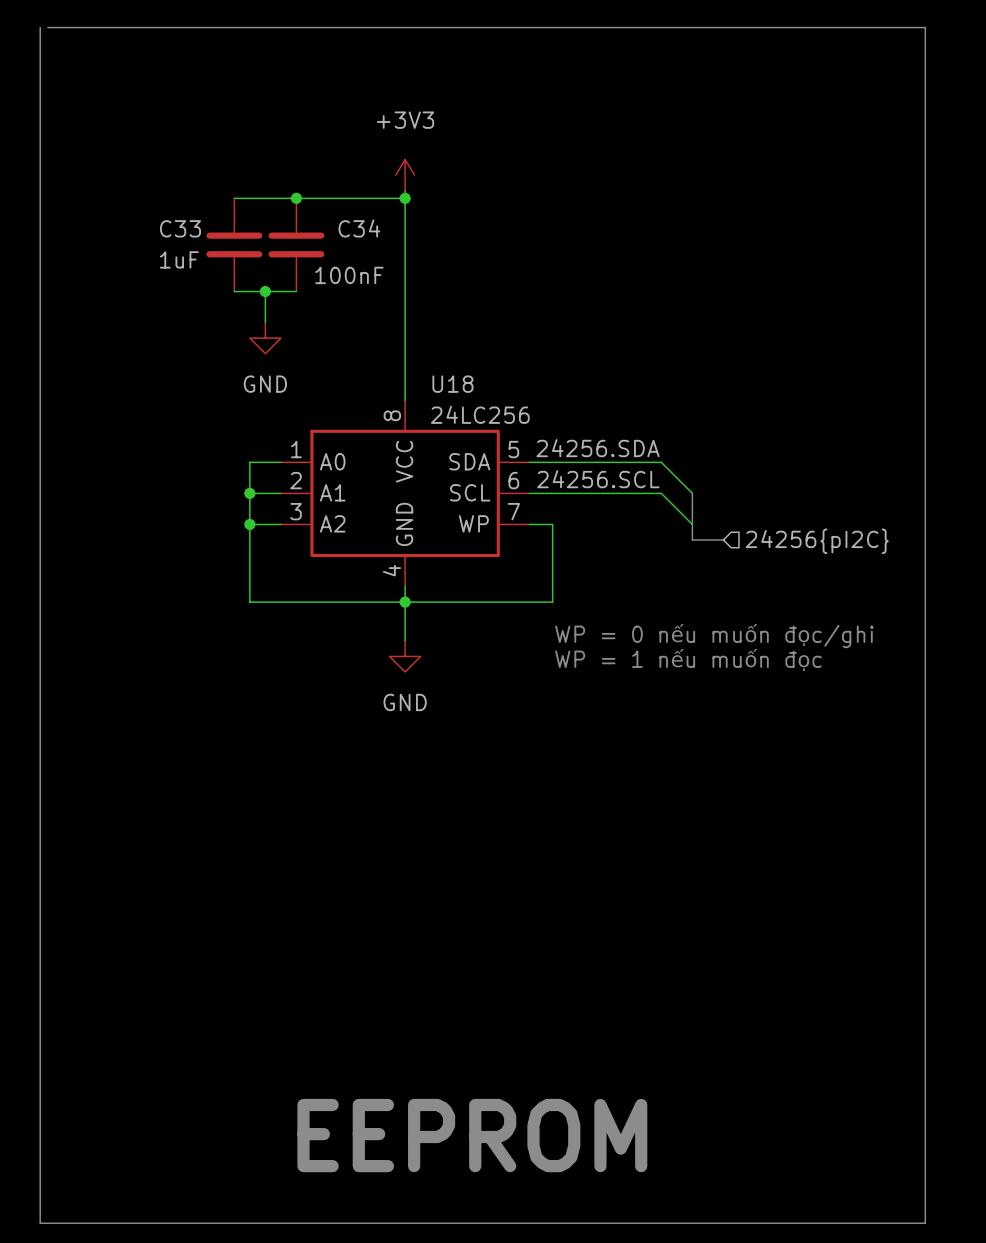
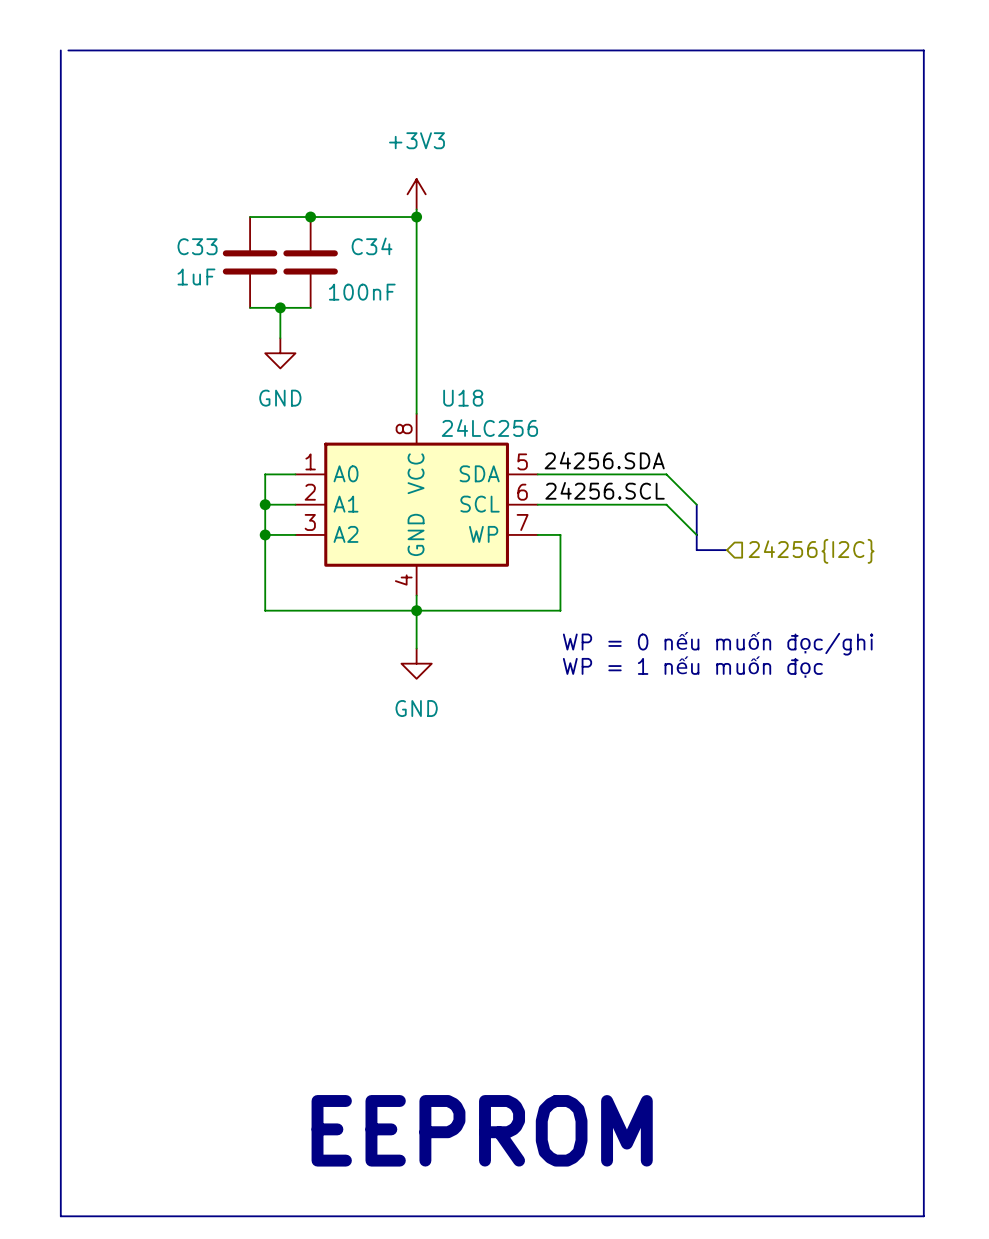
hierarchical label: 24256{pI2C} (817, 541) -> 24256{I2C} (811, 551)

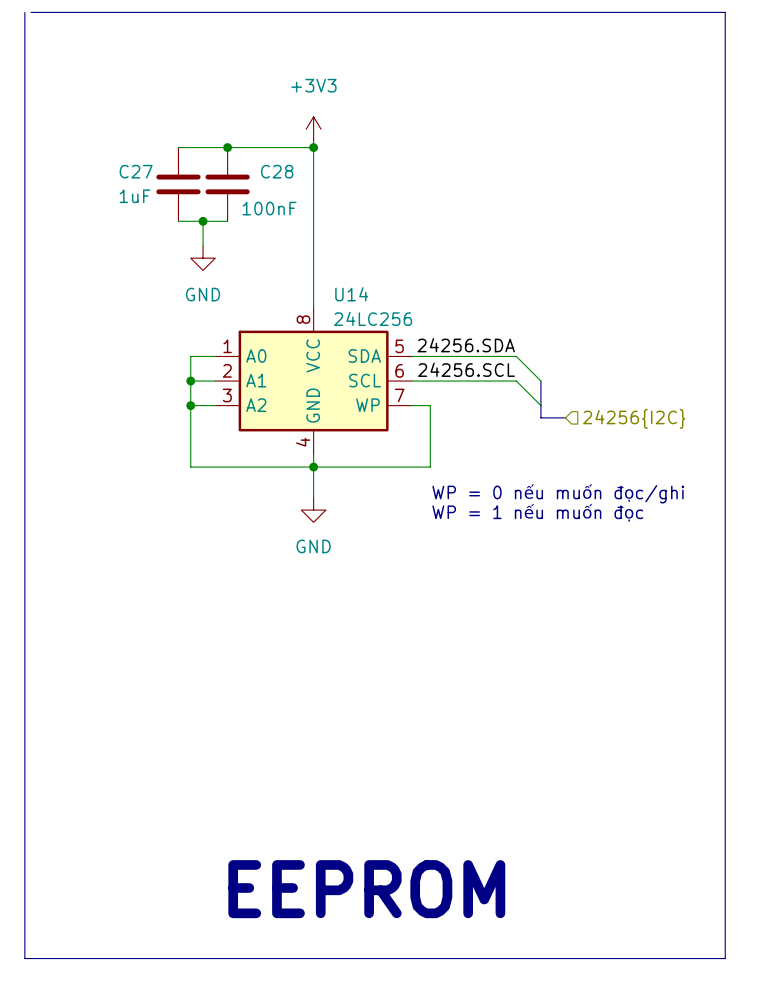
C33 name: C33 (197, 246) -> C27 (136, 171)
C34 name: C34 (372, 246) -> C28 (277, 171)
U18 name: U18 (463, 398) -> U14 (351, 294)

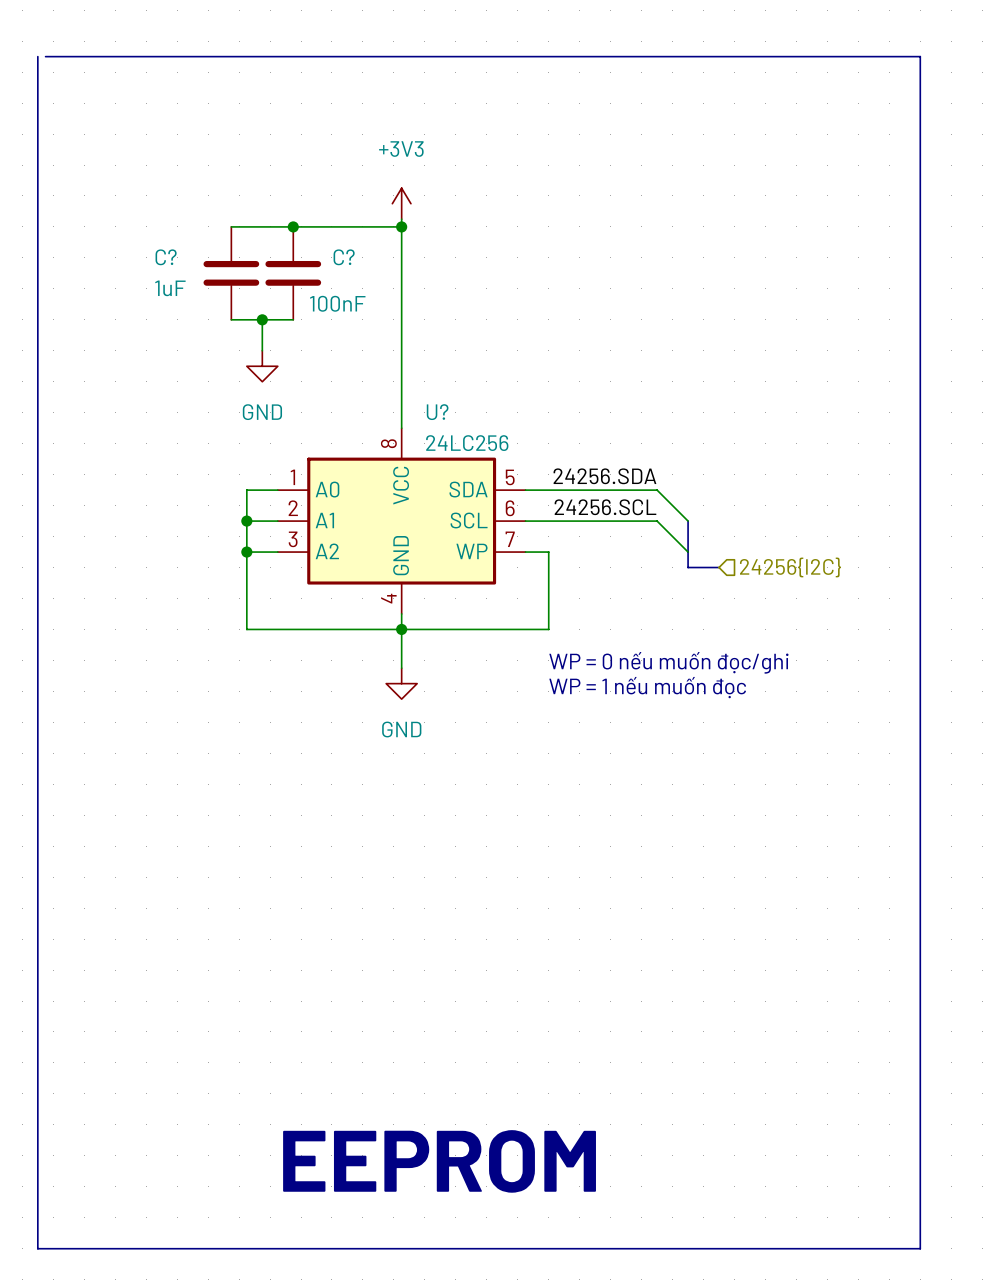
C27 name: C27 (136, 171) -> C? (166, 257)
C28 name: C28 (277, 171) -> C? (344, 257)
U14 name: U14 (351, 294) -> U? (437, 412)

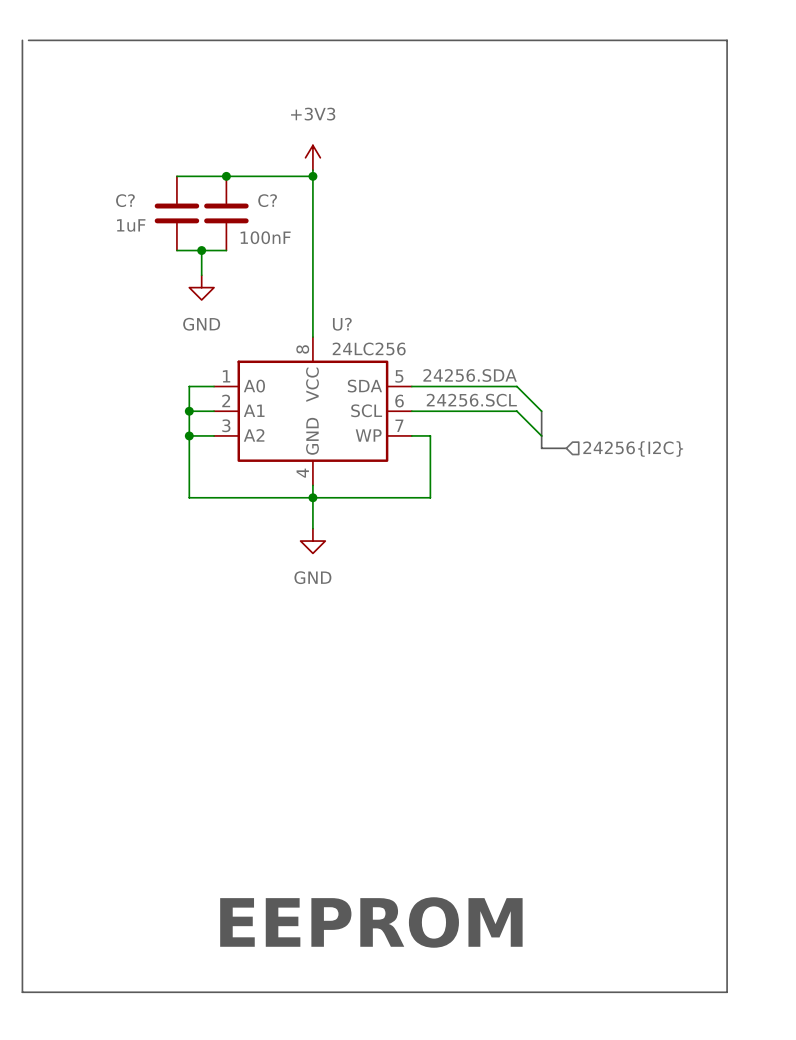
text: WP = 0 nếu muốn đọc/ghi (668, 662) -> none
text: WP = 1 nếu muốn đọc (647, 687) -> none

